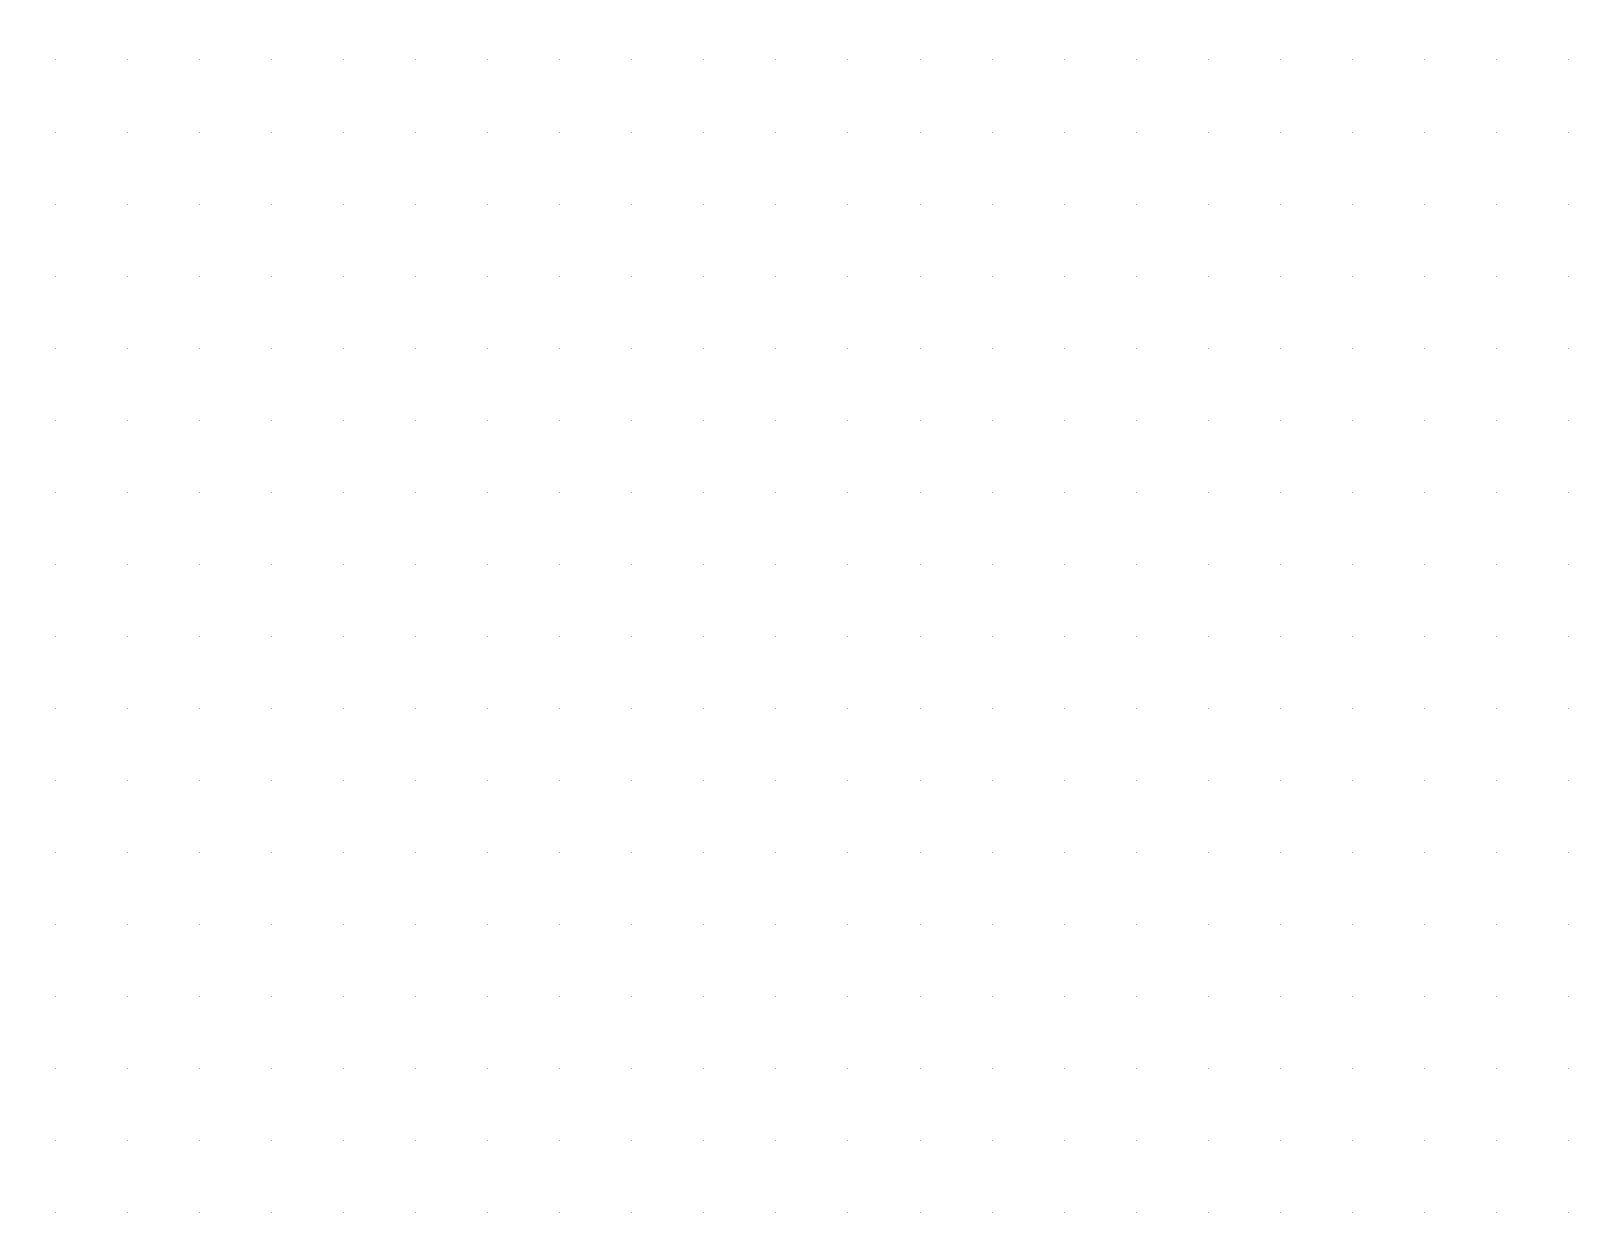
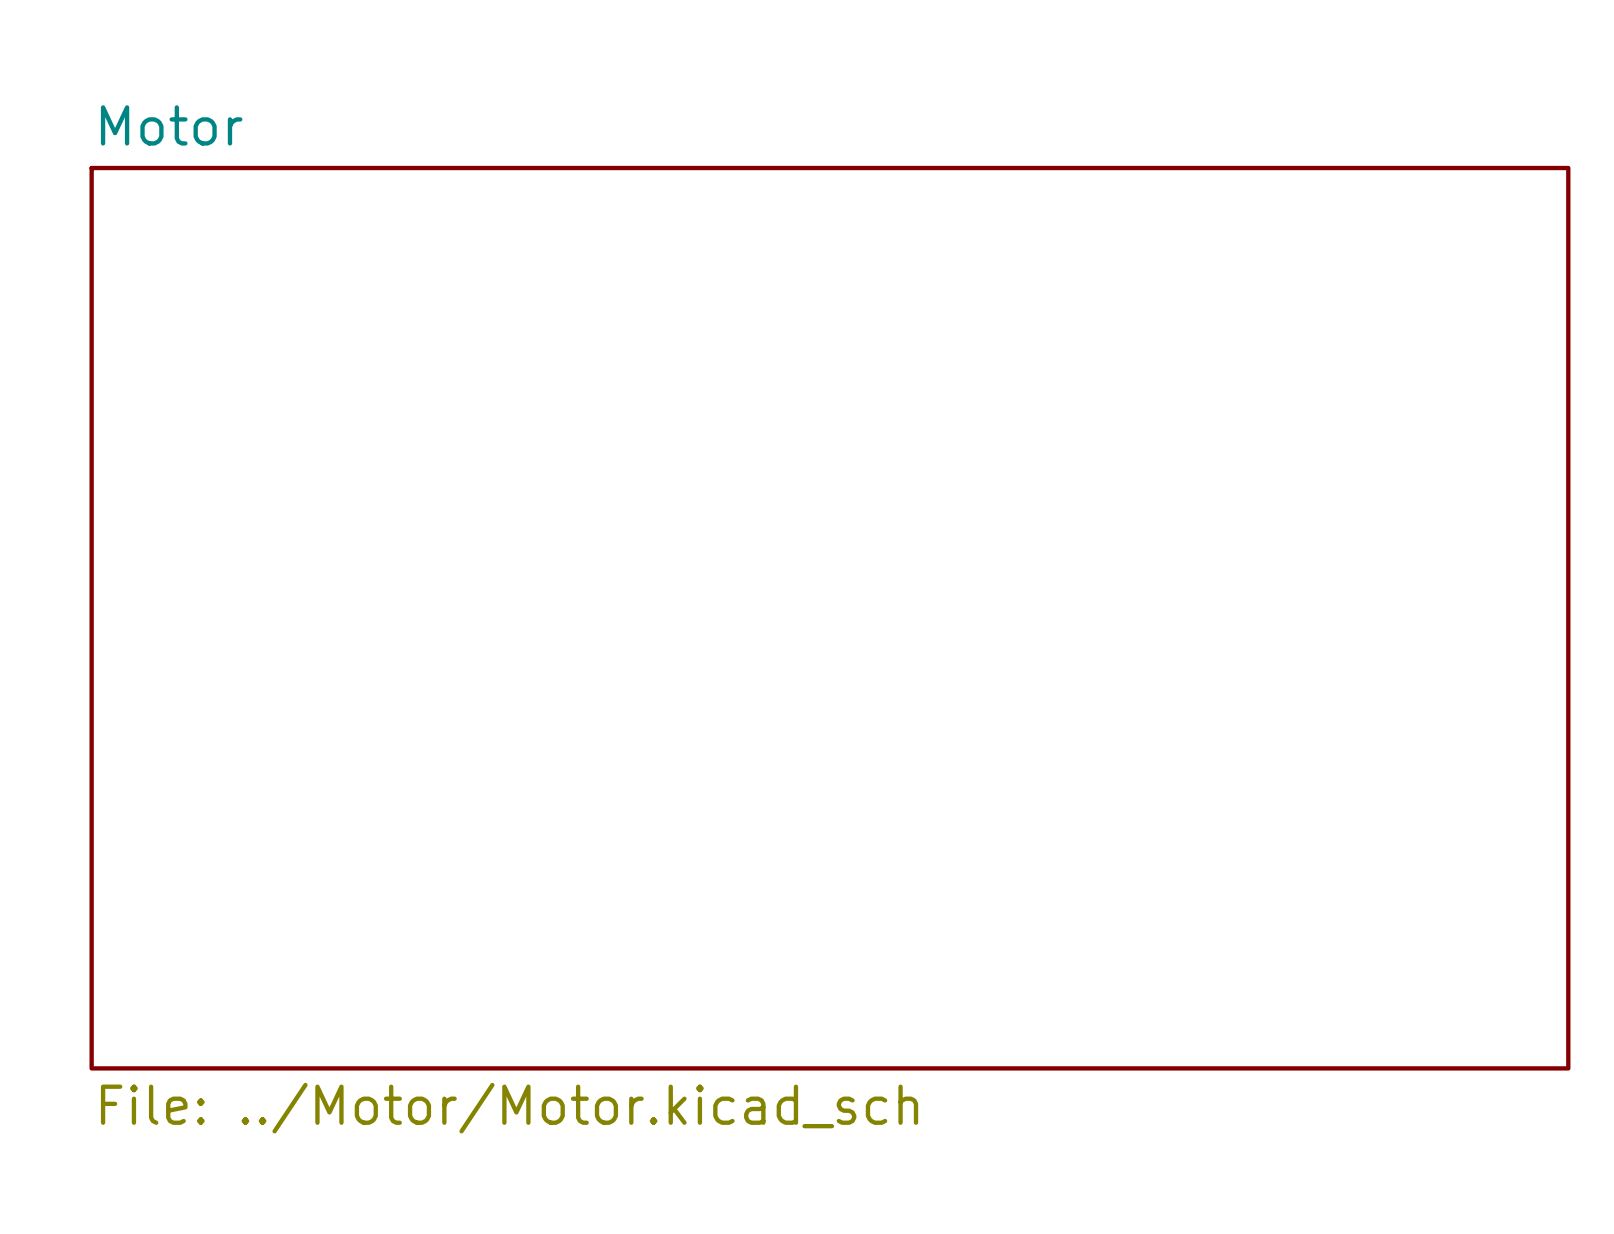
sheet Motor: none -> File: ../Motor/Motor.kicad_sch (829, 618)

